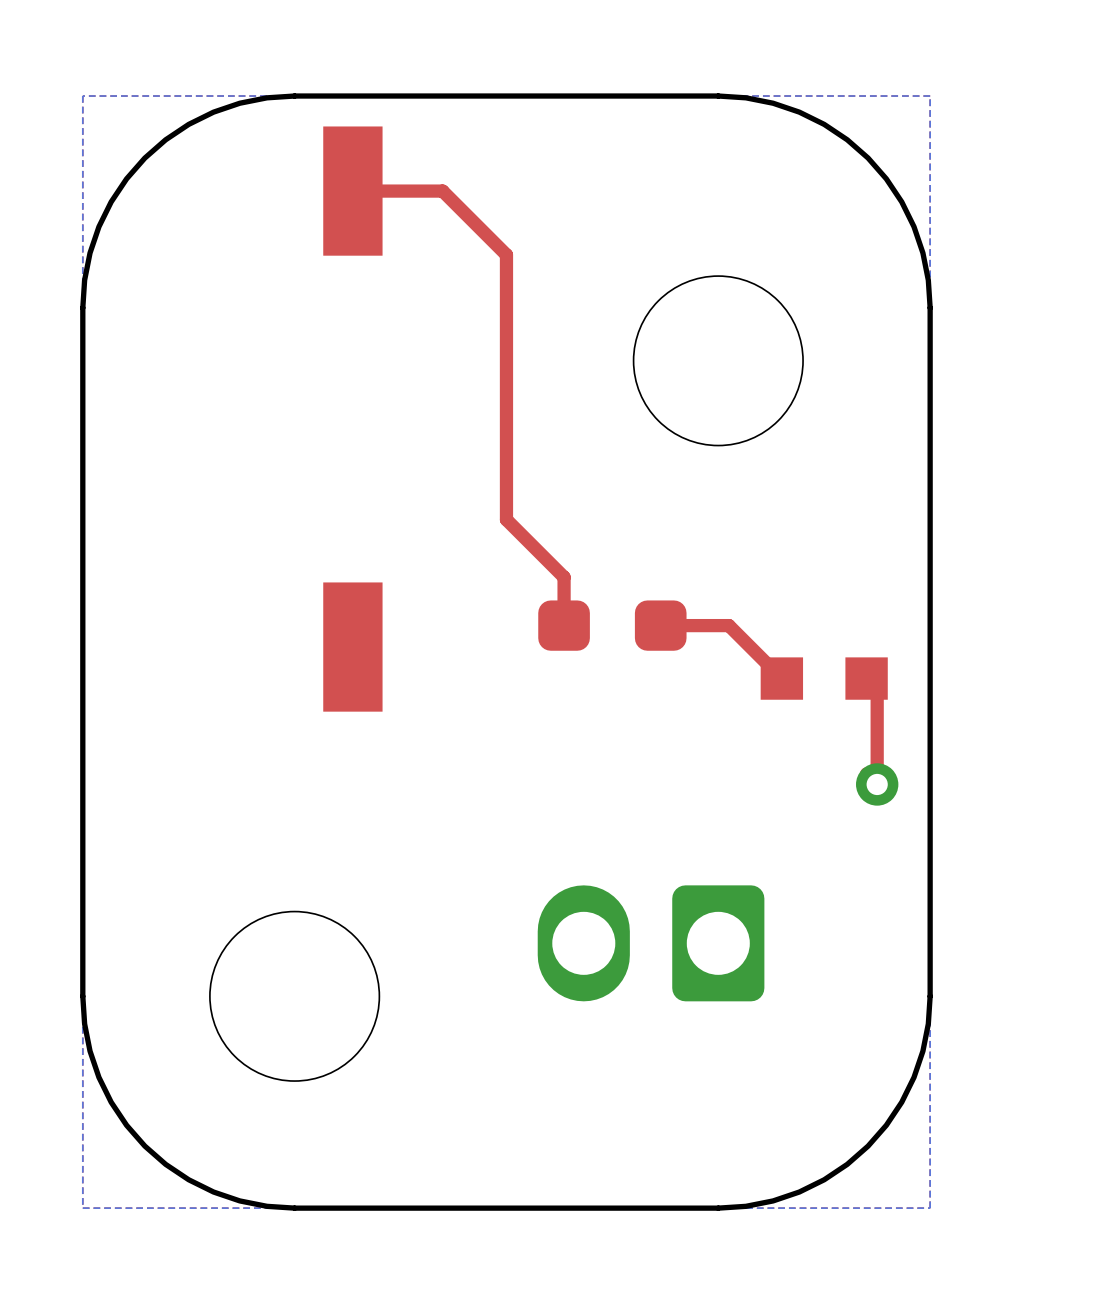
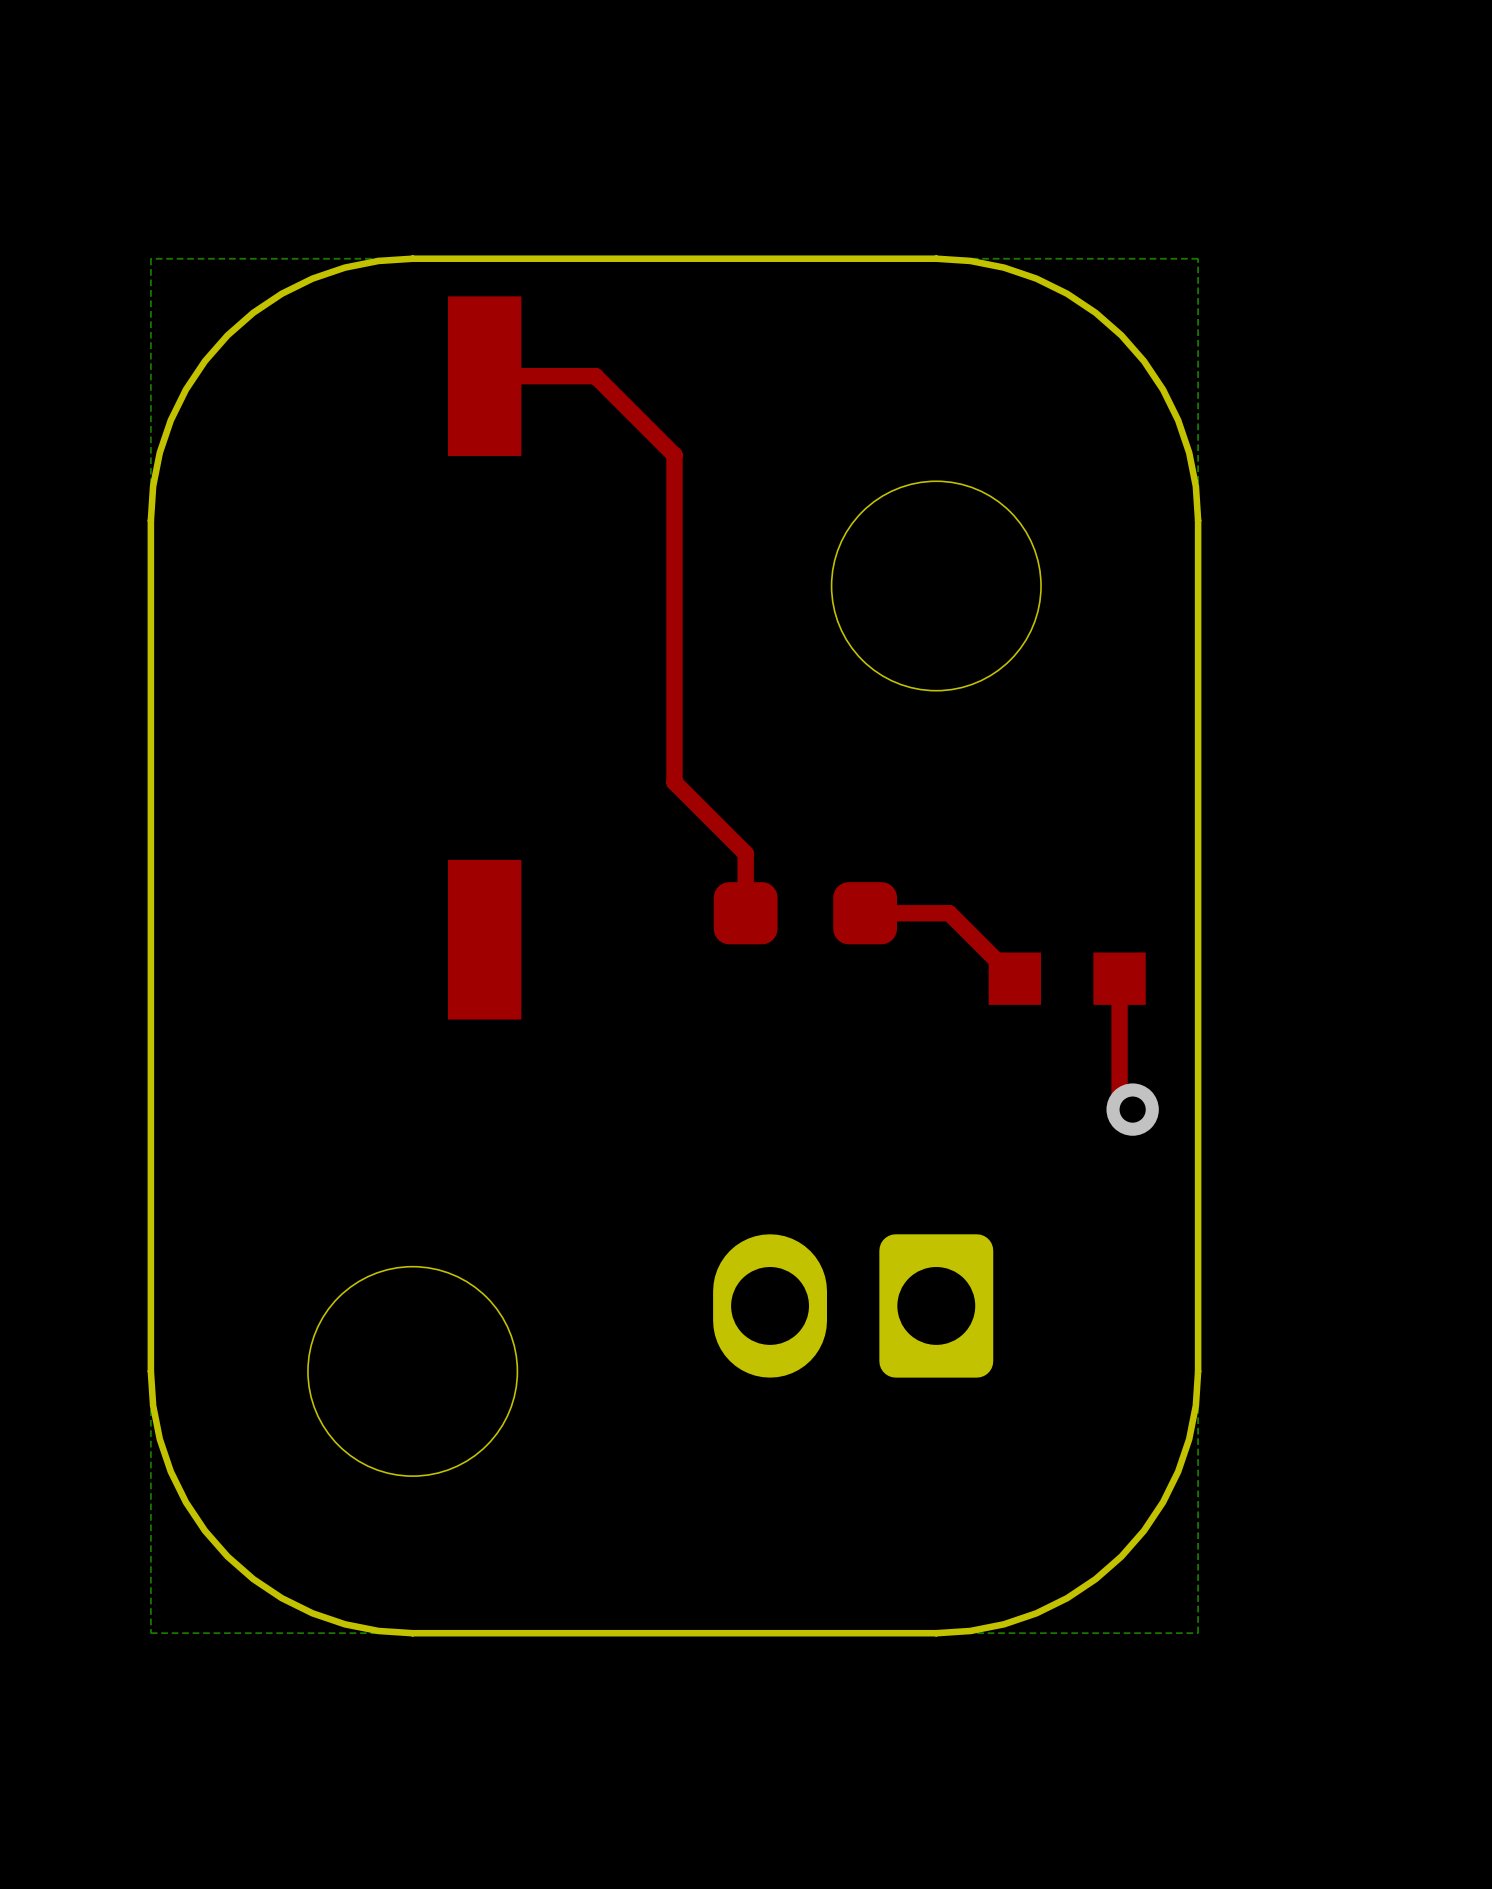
top track: (866, 678) (877, 689) (877, 784) -> (1119, 978) (1119, 1096)

